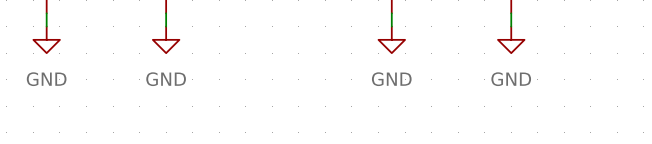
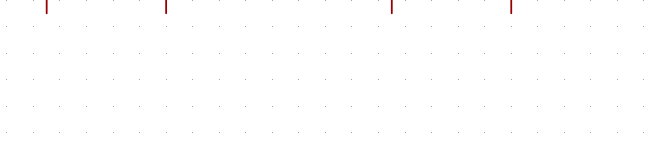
wire: (46, 13) (46, 26) -> none
wire: (166, 13) (166, 26) -> none
wire: (391, 13) (391, 26) -> none
wire: (511, 13) (511, 26) -> none
power symbol: GND (46, 39) -> none
power symbol: GND (166, 39) -> none
power symbol: GND (391, 39) -> none
power symbol: GND (511, 39) -> none

